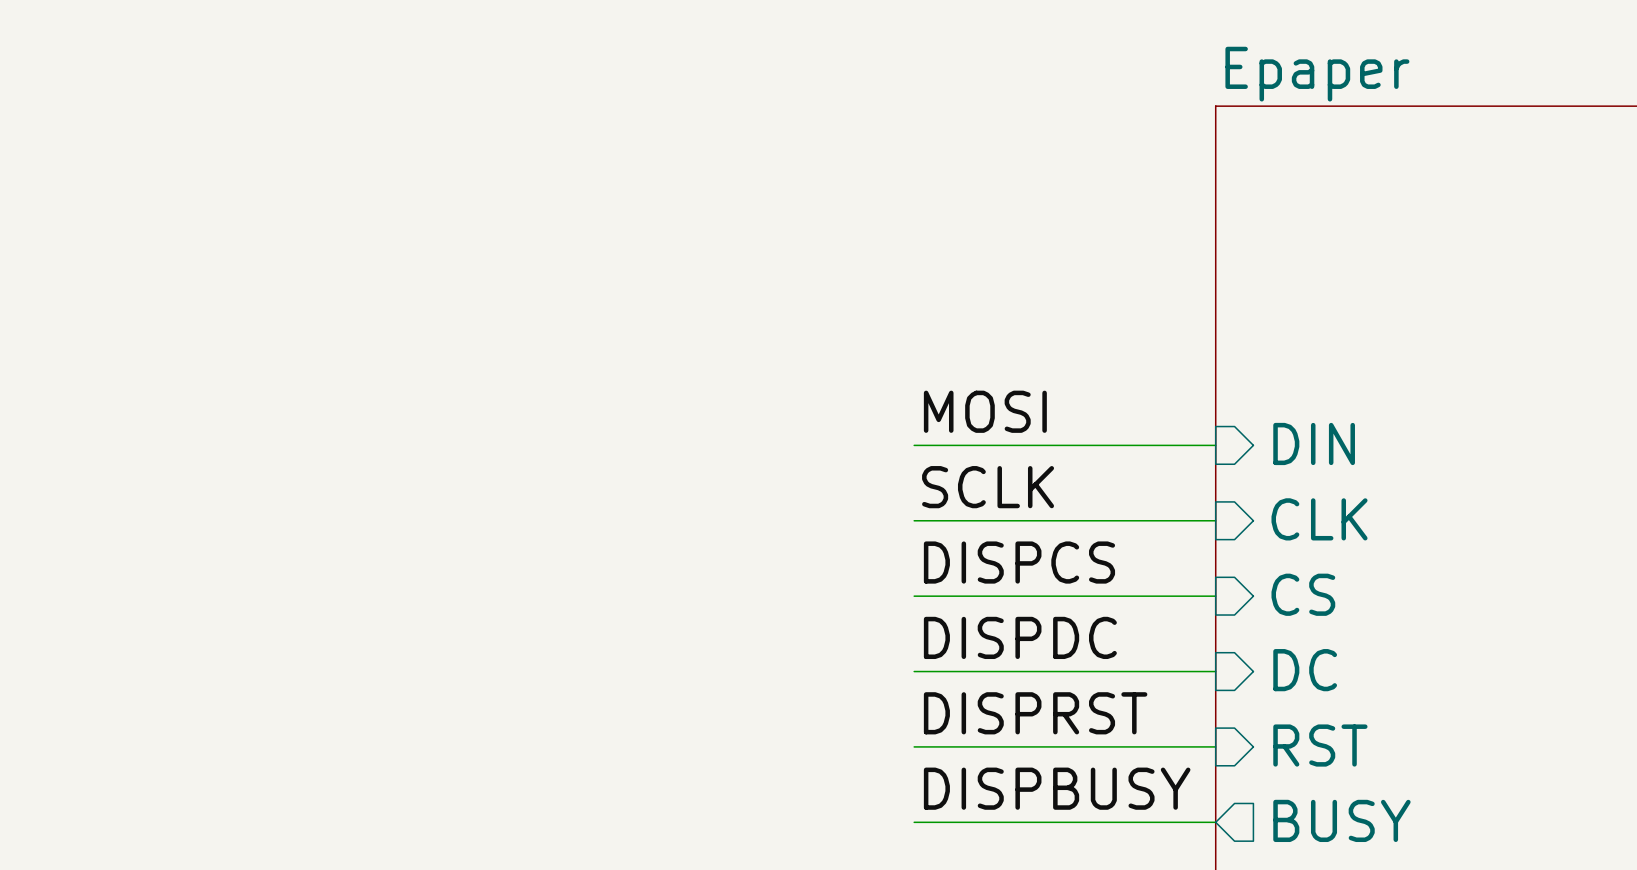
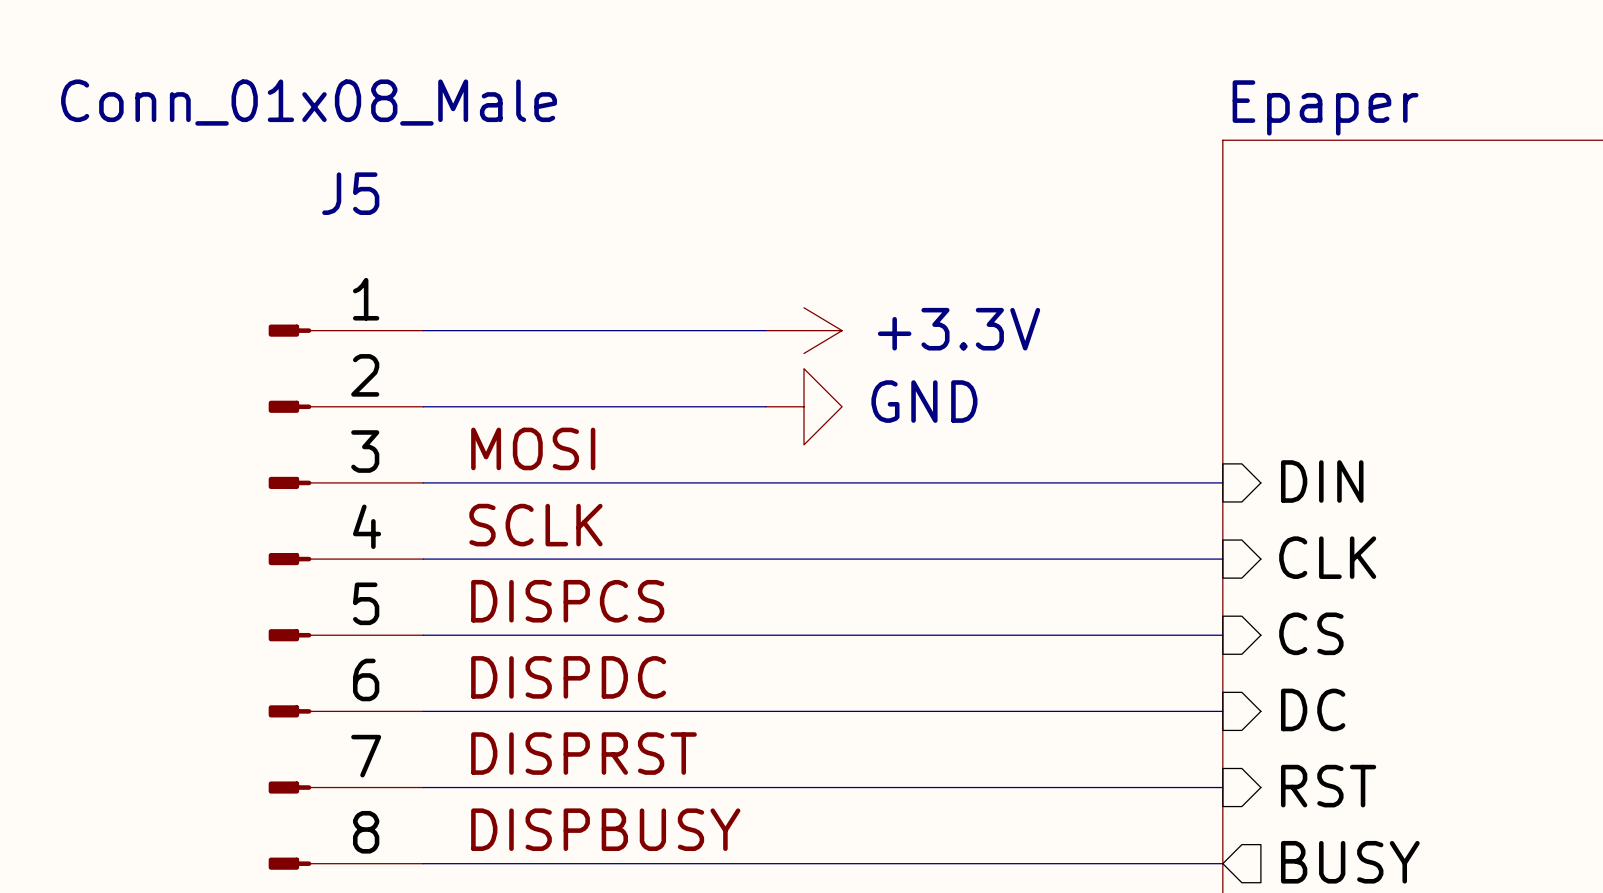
wire: none -> (423, 330) (765, 330)
power symbol: none -> +3.3V (804, 330)
wire: none -> (423, 406) (765, 406)
power symbol: none -> GND (804, 406)
label position: MOSI (985, 411) -> MOSI (533, 448)
wire: none -> (423, 482) (918, 482)
label position: SCLK (988, 487) -> SCLK (535, 525)
wire: none -> (423, 559) (918, 559)
J5: none -> Conn_01x08_Male (345, 597)
label position: DISPCS (1019, 562) -> DISPCS (567, 601)
wire: none -> (423, 635) (918, 635)
label position: DISPDC (1020, 637) -> DISPDC (568, 677)
wire: none -> (423, 711) (918, 711)
label position: DISPRST (1035, 713) -> DISPRST (584, 753)
wire: none -> (423, 787) (918, 787)
label position: DISPBUSY (1057, 788) -> DISPBUSY (605, 829)
wire: none -> (423, 863) (918, 863)

